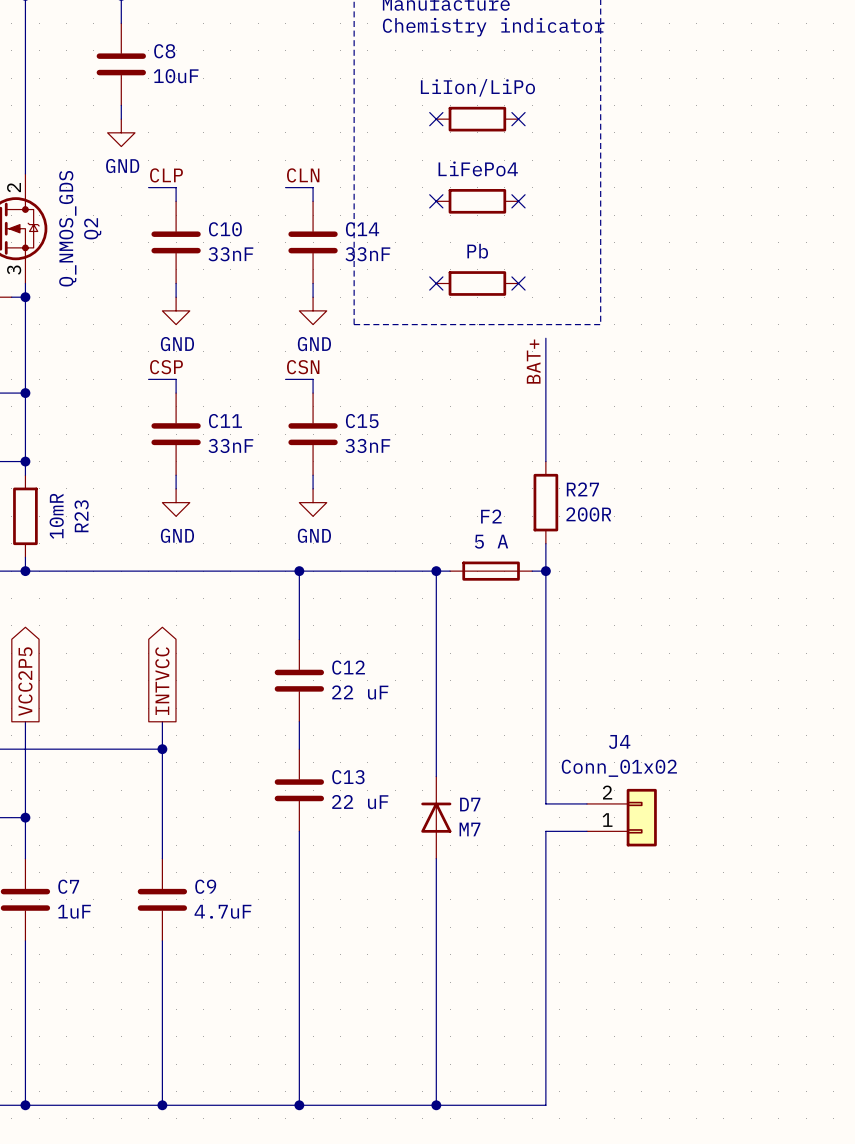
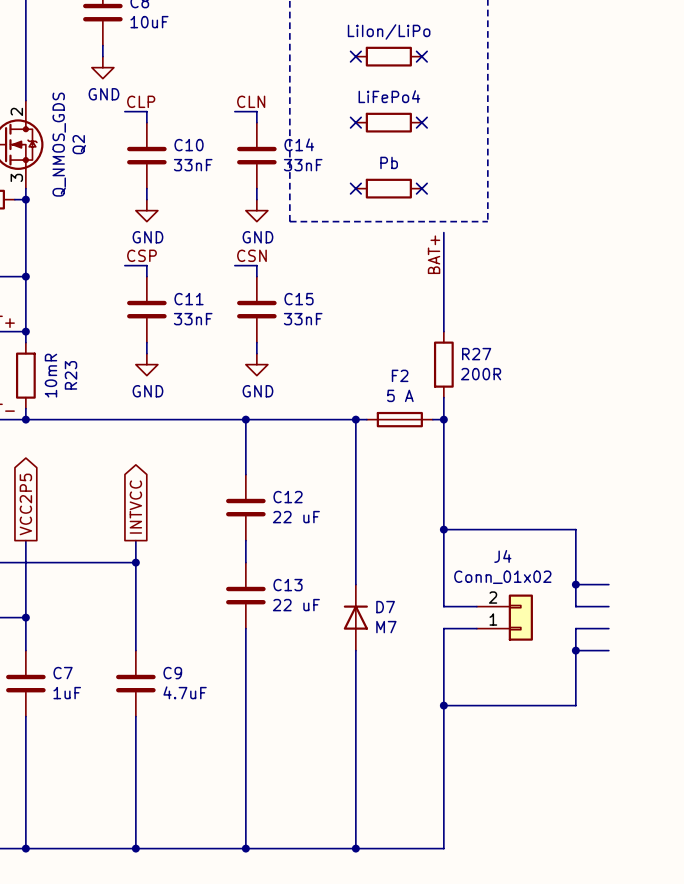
wire: none -> (443, 529) (575, 529) (575, 606) (608, 606)
junction: none -> (443, 529)
wire: none -> (575, 584) (608, 584)
junction: none -> (575, 584)
wire: none -> (608, 628) (575, 628) (575, 705) (443, 705)
wire: none -> (575, 650) (608, 650)
junction: none -> (575, 650)
junction: none -> (443, 705)

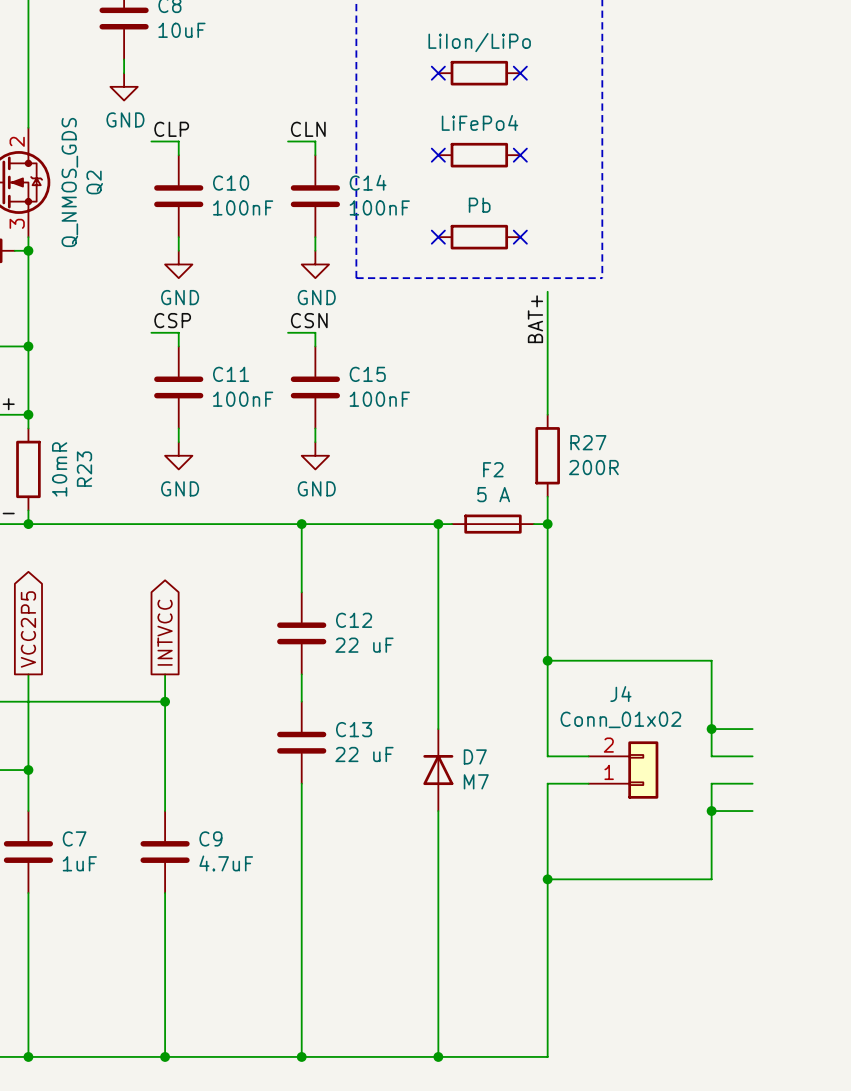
C10 value: 33nF (193, 165) -> 100nF (243, 207)
C14 value: 33nF (303, 165) -> 100nF (379, 207)
C11 value: 33nF (193, 319) -> 100nF (243, 399)
C15 value: 33nF (303, 319) -> 100nF (379, 399)

